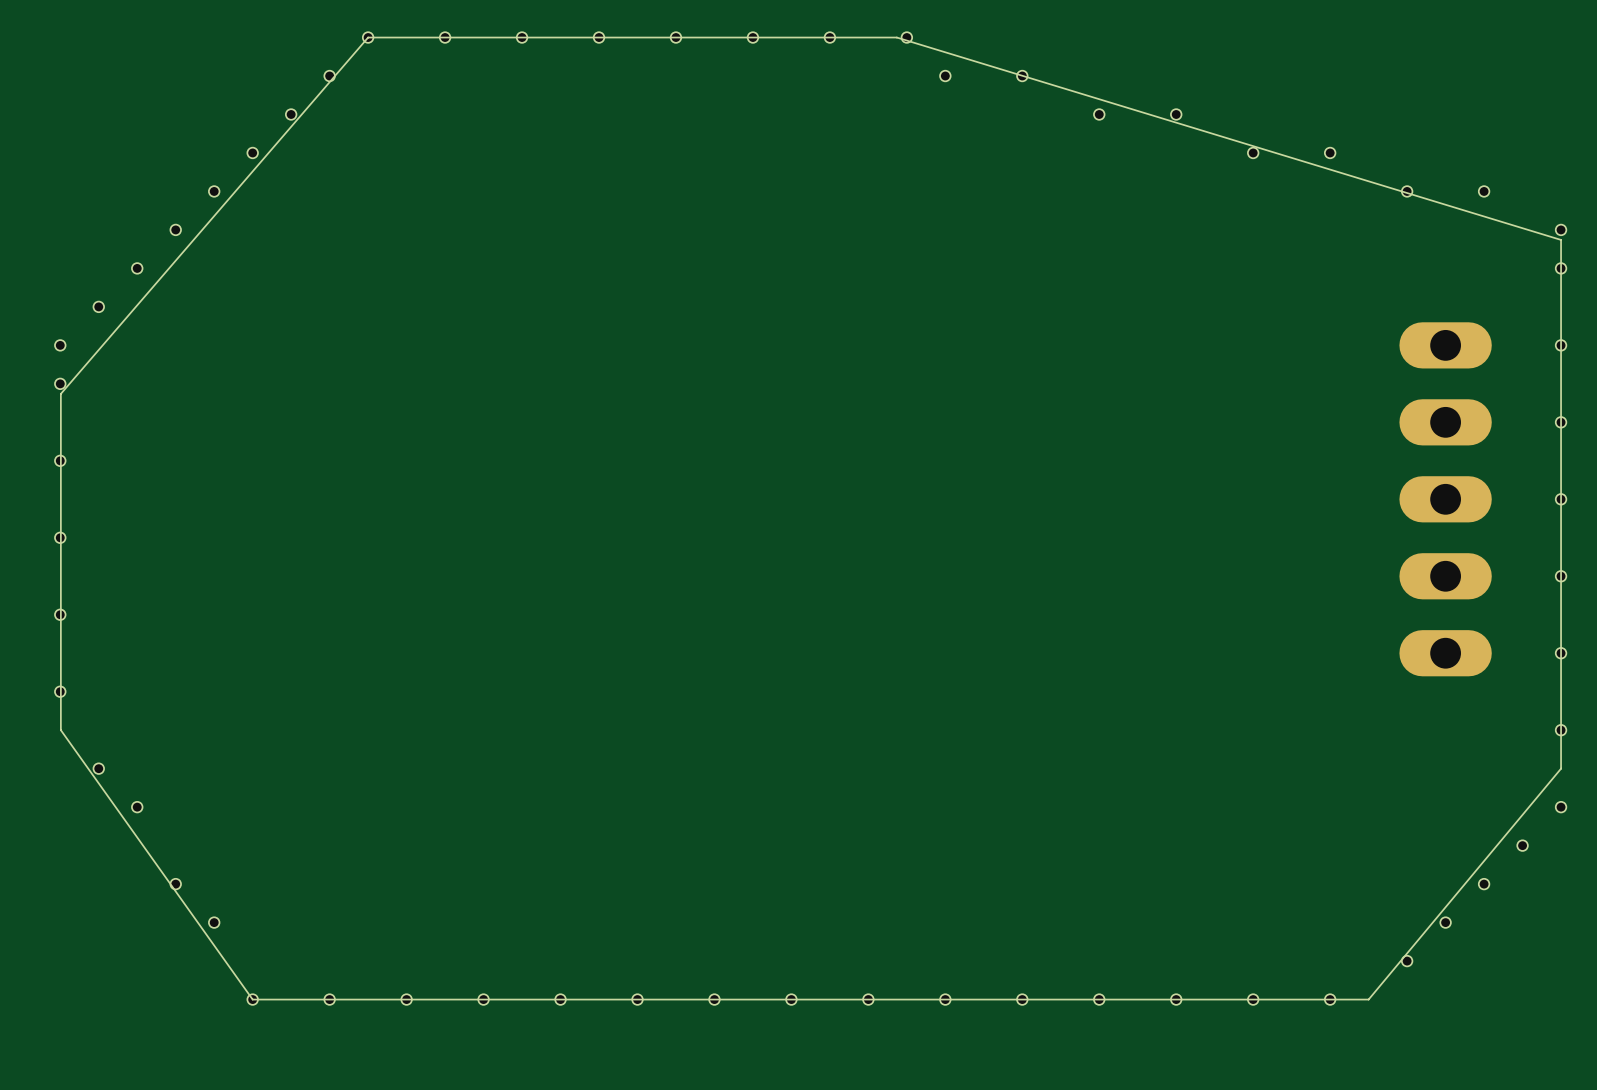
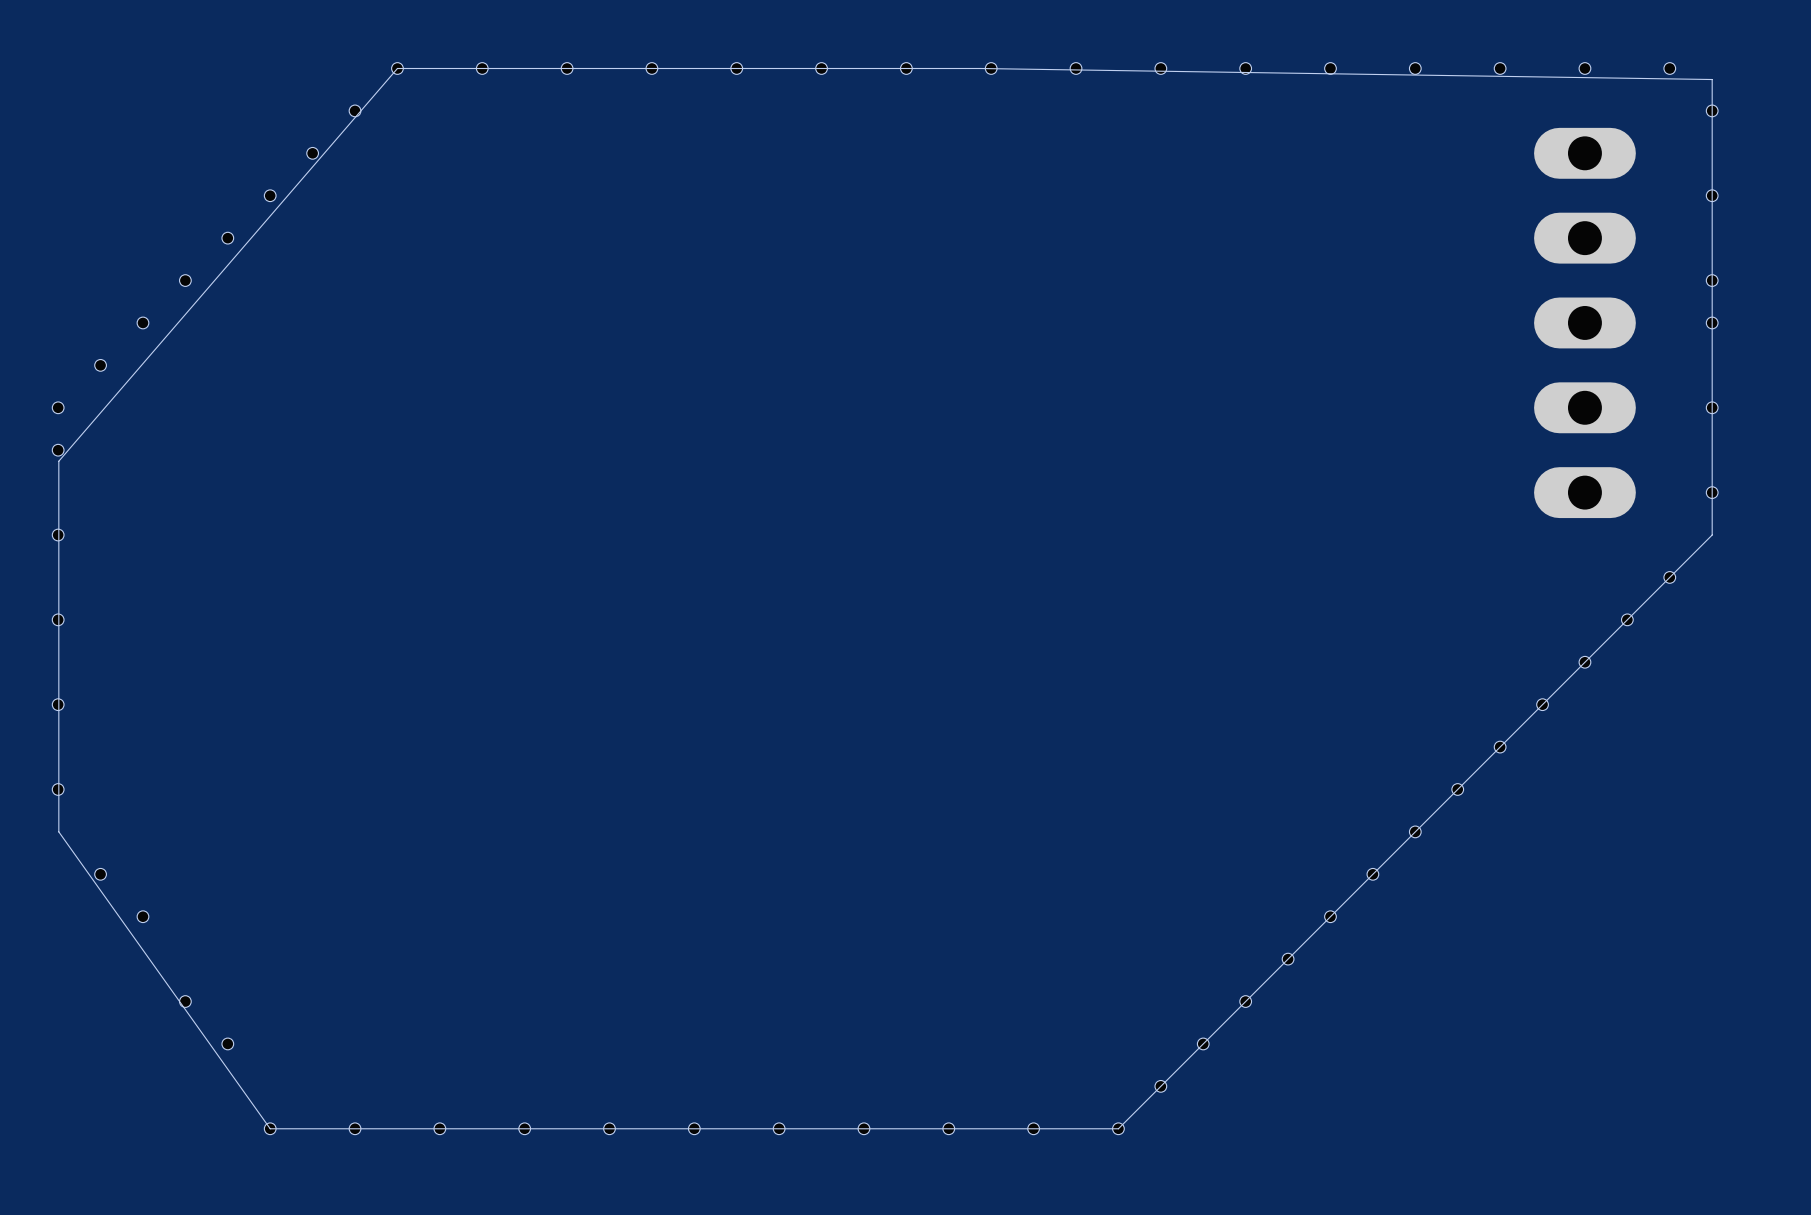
board edge: (896, 37) (1561, 239) -> (980, 68) (1712, 79) (1712, 291)
hole: none -> (1076, 68)
hole: none -> (1160, 68)
hole: none -> (1245, 68)
hole: none -> (1330, 68)
hole: none -> (1415, 68)
hole: none -> (1500, 68)
hole: none -> (1584, 68)
hole: none -> (1669, 68)
hole: (945, 76) -> none
hole: (1022, 76) -> none
hole: none -> (1712, 110)
hole: (1099, 114) -> none
hole: (1176, 114) -> none
hole: (1253, 152) -> none
hole: (1330, 152) -> none
hole: none -> (1712, 195)
hole: (1407, 191) -> none
hole: (1484, 191) -> none
board edge: (1561, 460) (1561, 768) (1368, 999) (1022, 999) -> (1712, 535) (1118, 1128)
part position: (1445, 499) -> (1584, 322)
hole position: (1561, 499) -> (1669, 577)
hole: none -> (1627, 619)
hole: none -> (1584, 662)
hole: (1561, 576) -> none
hole: none -> (1542, 704)
hole: none -> (1500, 747)
hole: (1561, 653) -> none
hole: none -> (1457, 789)
hole: none -> (1415, 831)
hole: (1561, 730) -> none
hole: none -> (1372, 874)
hole: none -> (1330, 916)
hole: (1561, 807) -> none
hole: none -> (1288, 959)
hole: (1522, 845) -> none
hole: none -> (1245, 1001)
hole: (1484, 884) -> none
hole: none -> (1203, 1043)
hole: (1445, 922) -> none
hole: none -> (1160, 1086)
hole: (1407, 961) -> none
hole: (1099, 999) -> none
hole: (1176, 999) -> none
hole: (1253, 999) -> none
hole: (1330, 999) -> none

